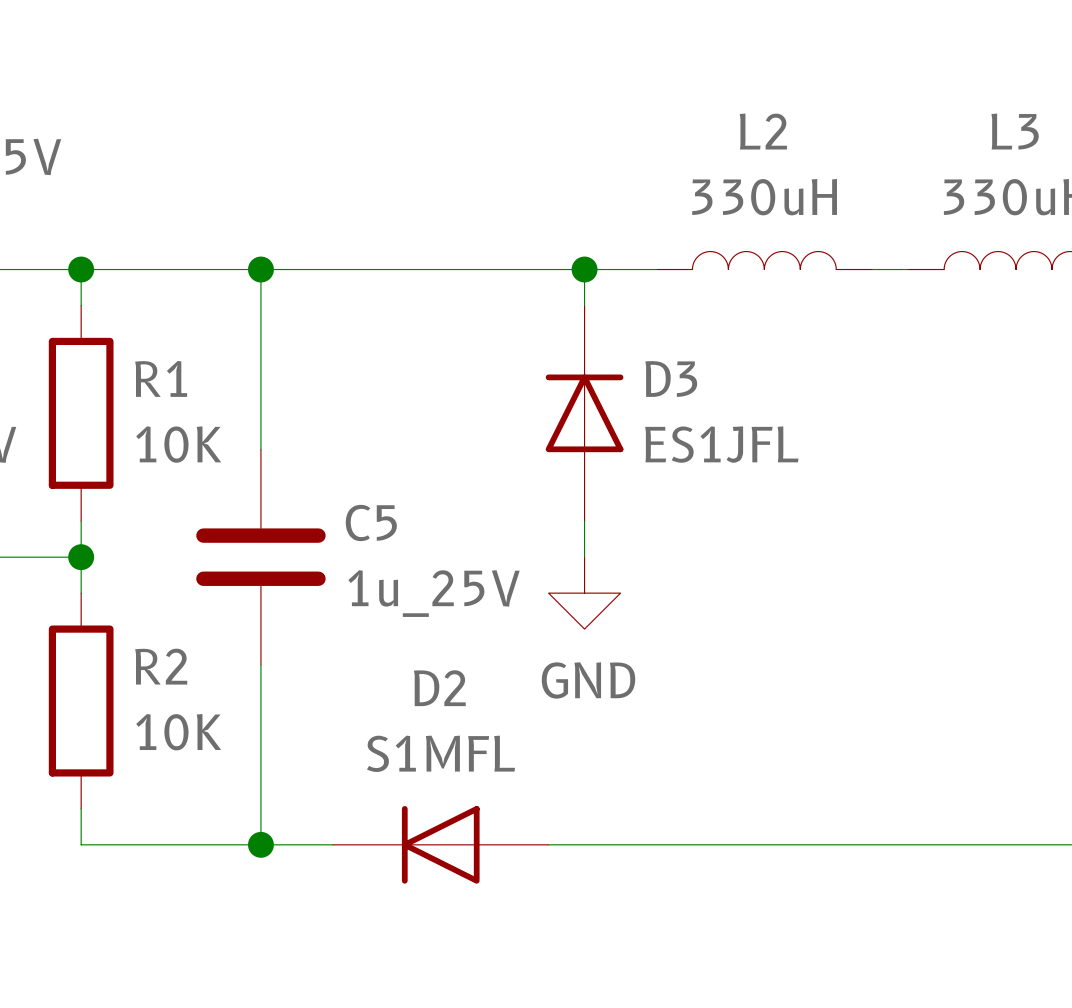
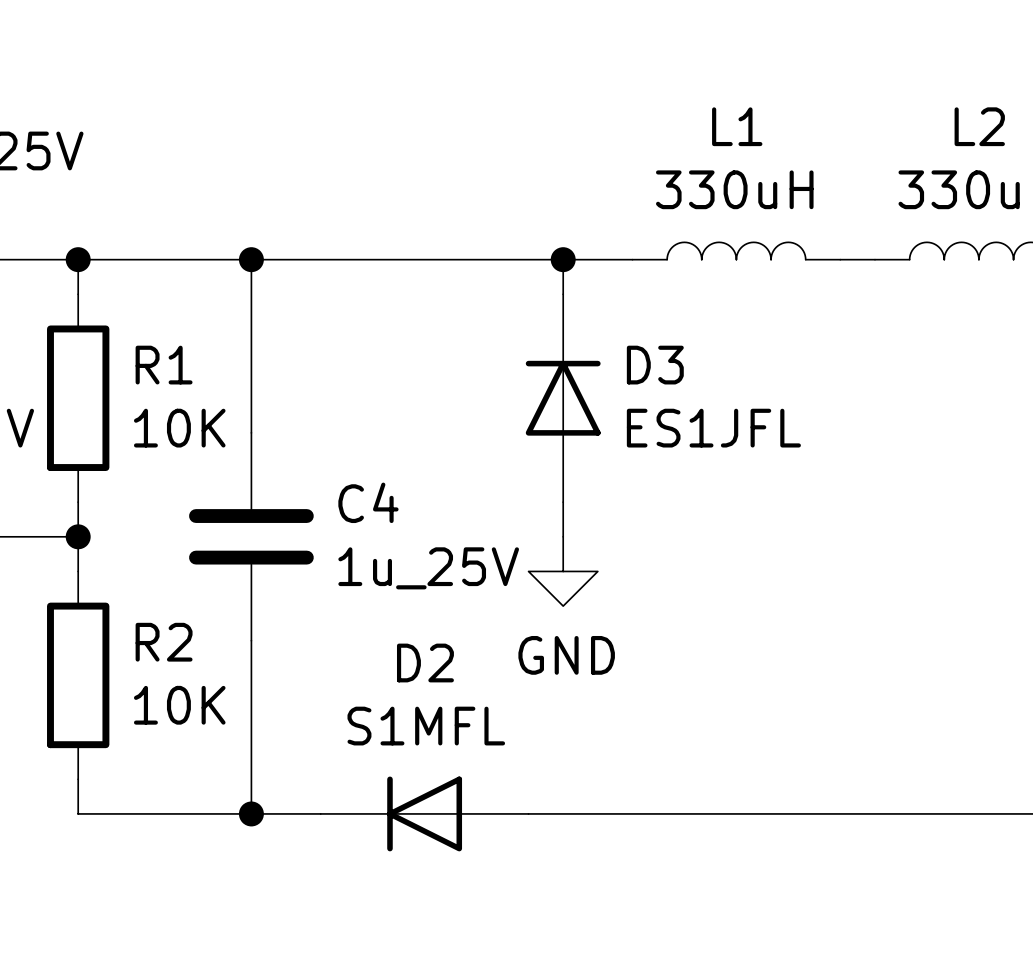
L2 name: L2 (763, 131) -> L1 (737, 126)
L3 name: L3 (1015, 131) -> L2 (979, 126)
C5 name: C5 (371, 522) -> C4 (368, 502)

